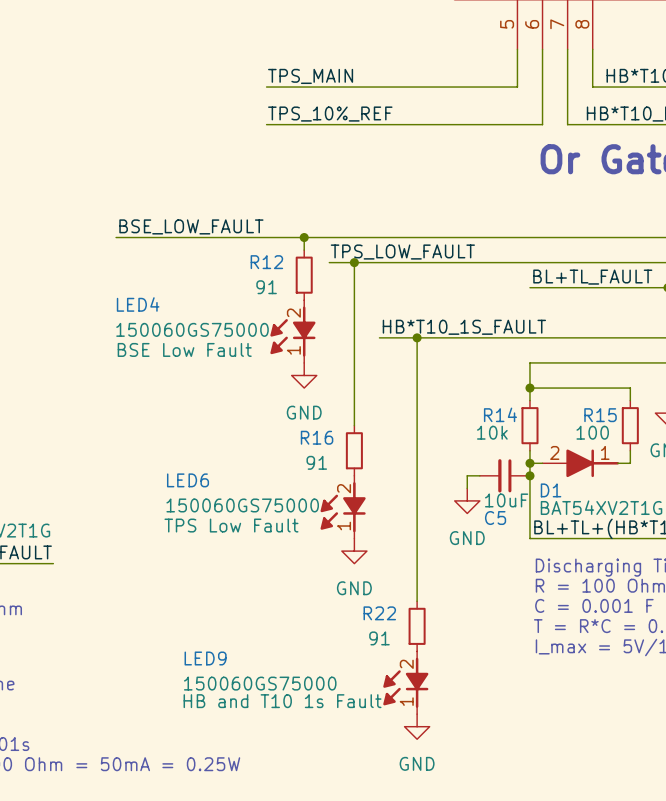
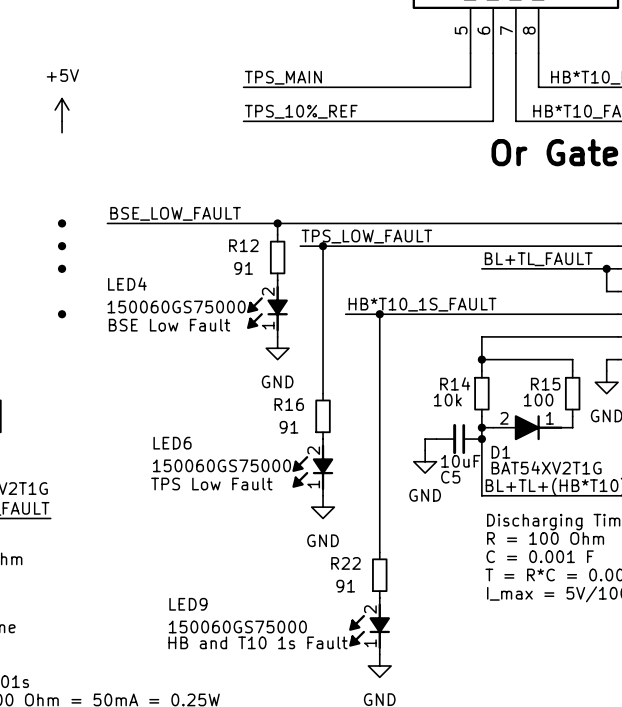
power symbol: none -> +5V (62, 109)
wire: none -> (62, 121) (62, 132)
junction: none -> (62, 223)
junction: none -> (62, 246)
junction: none -> (62, 268)
junction: none -> (62, 314)

